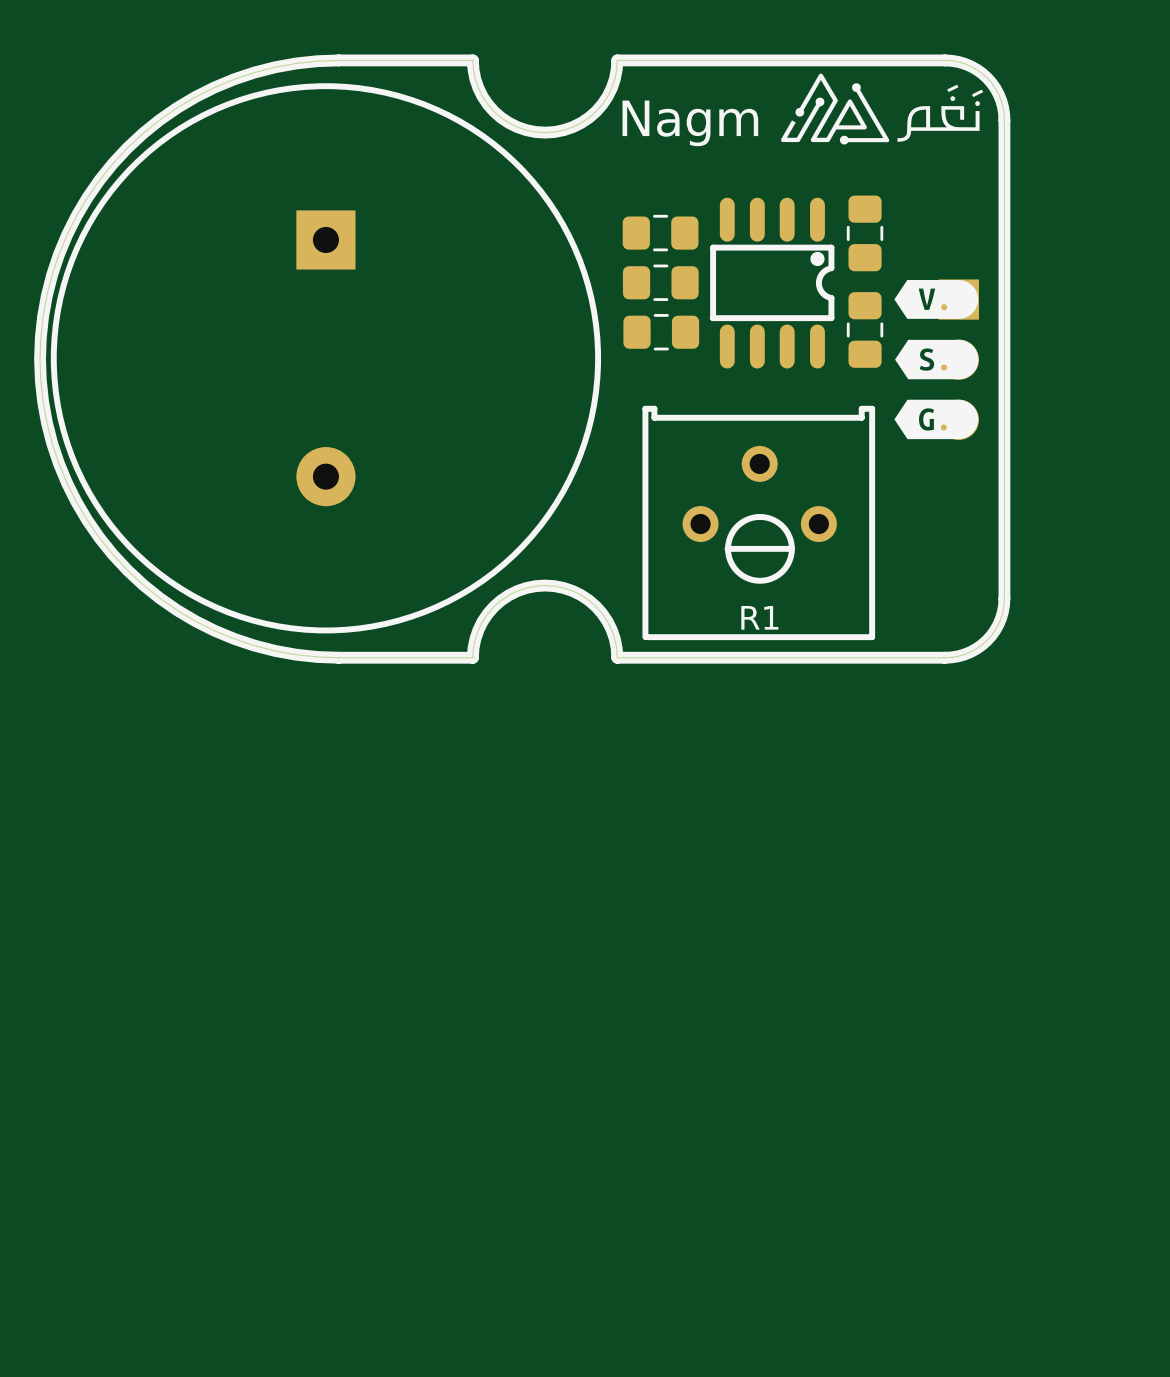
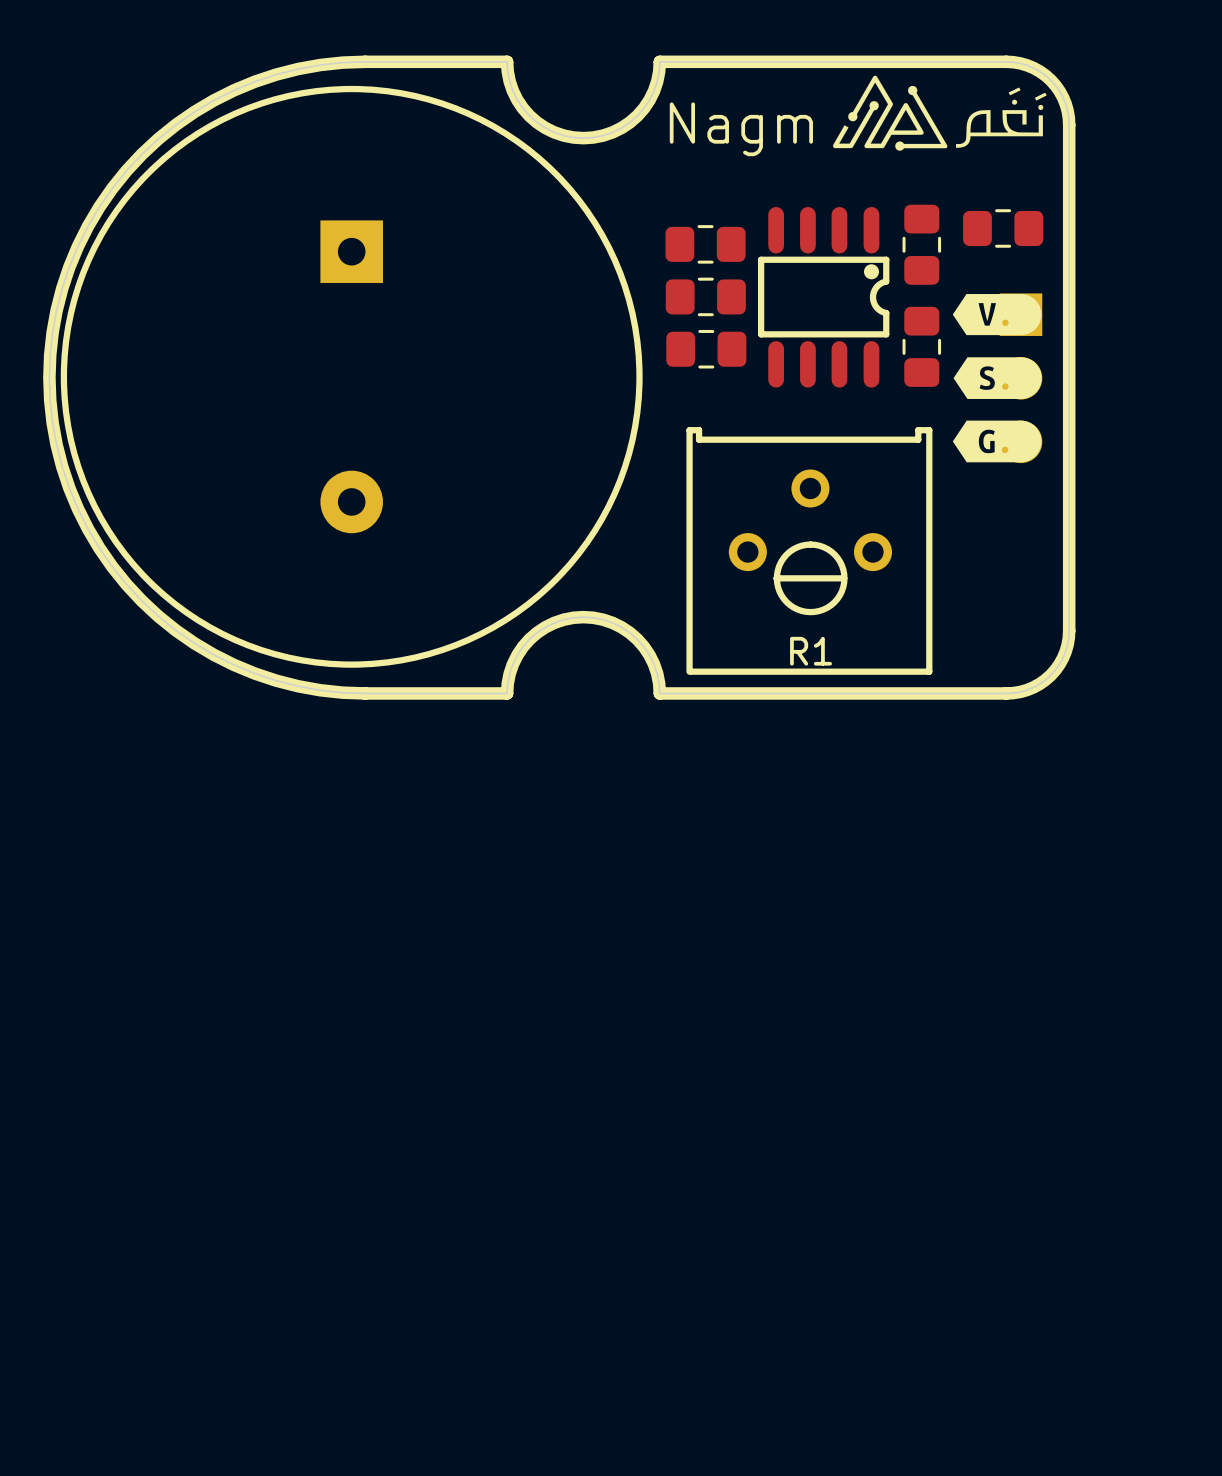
part: none -> (1003, 228)

